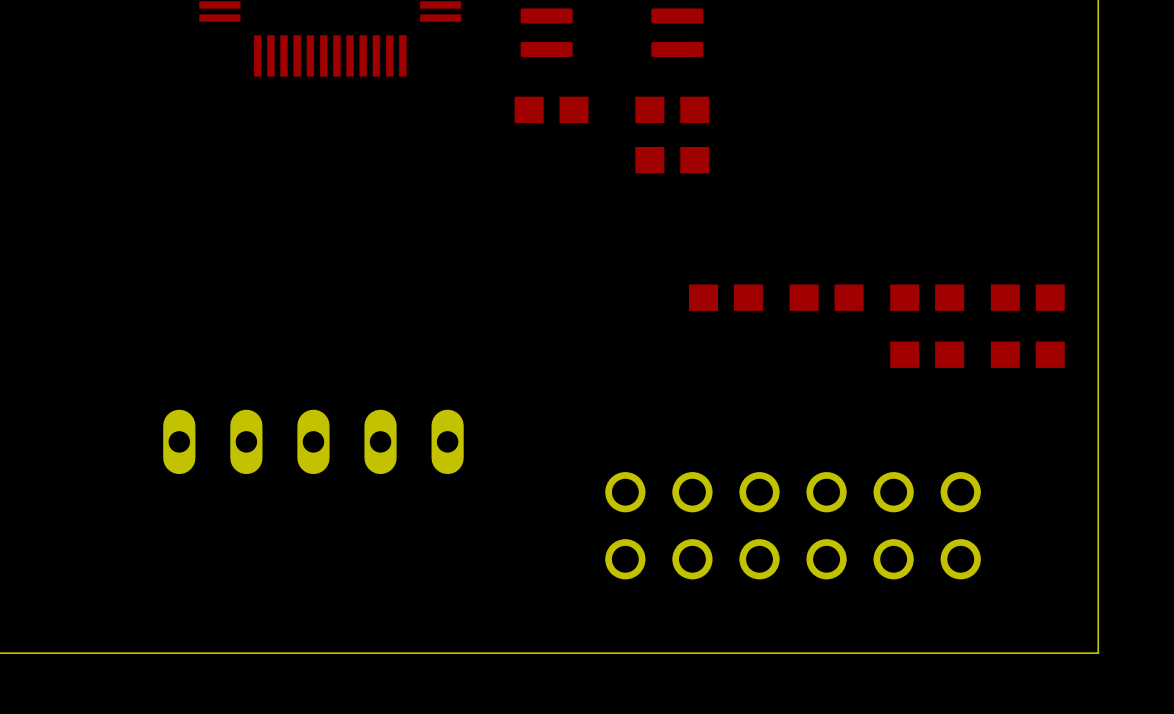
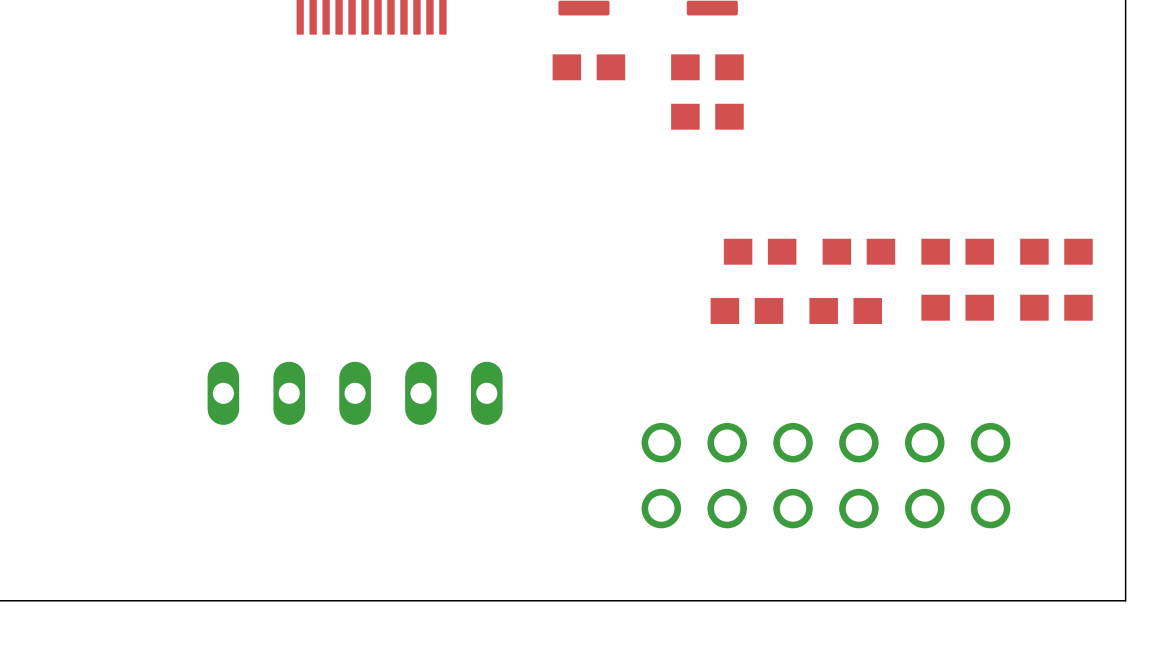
part: none -> (746, 310)
part: none -> (845, 310)

